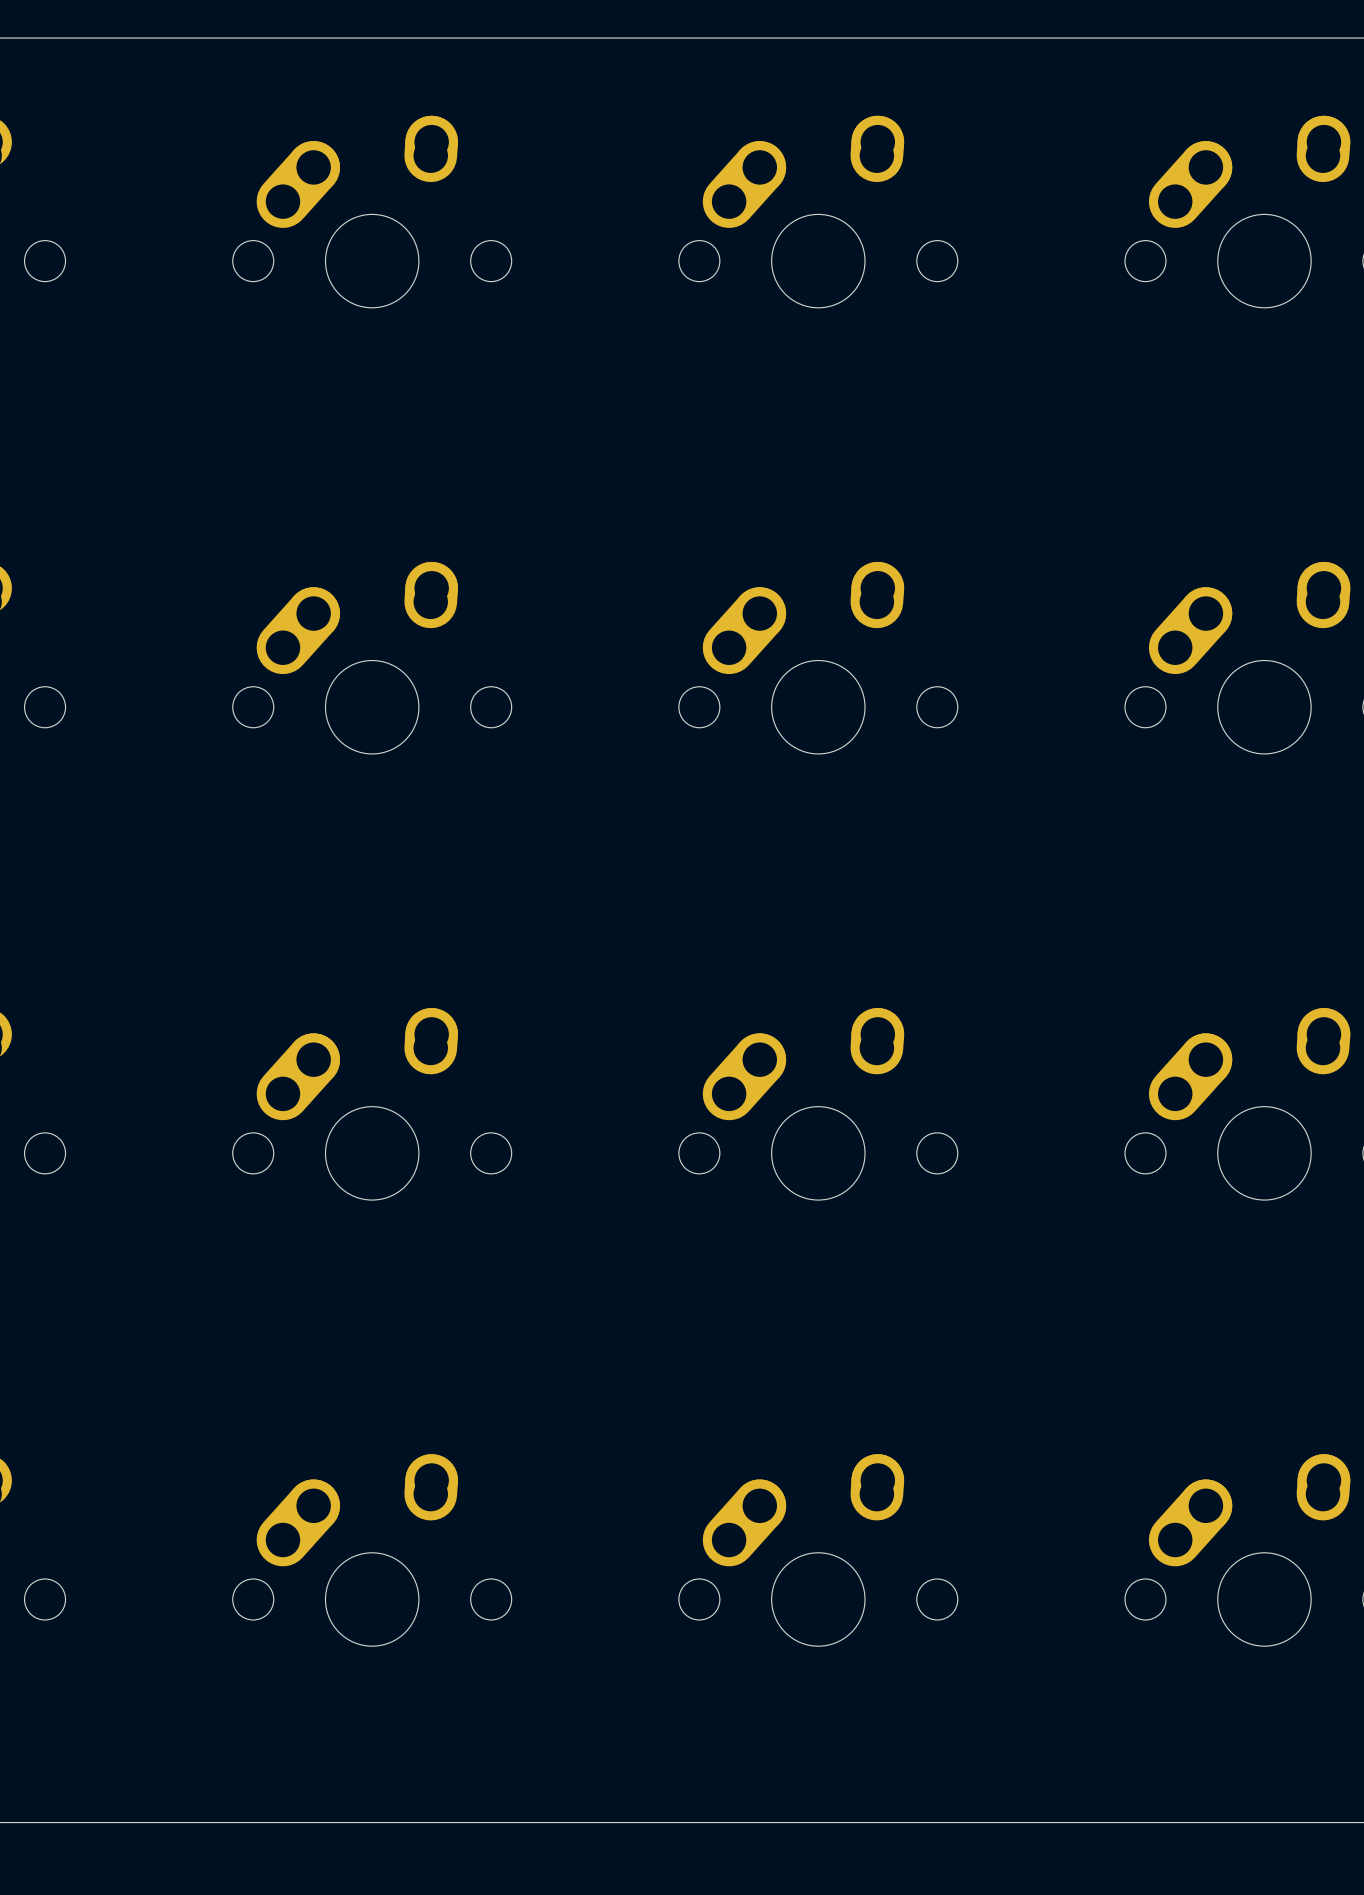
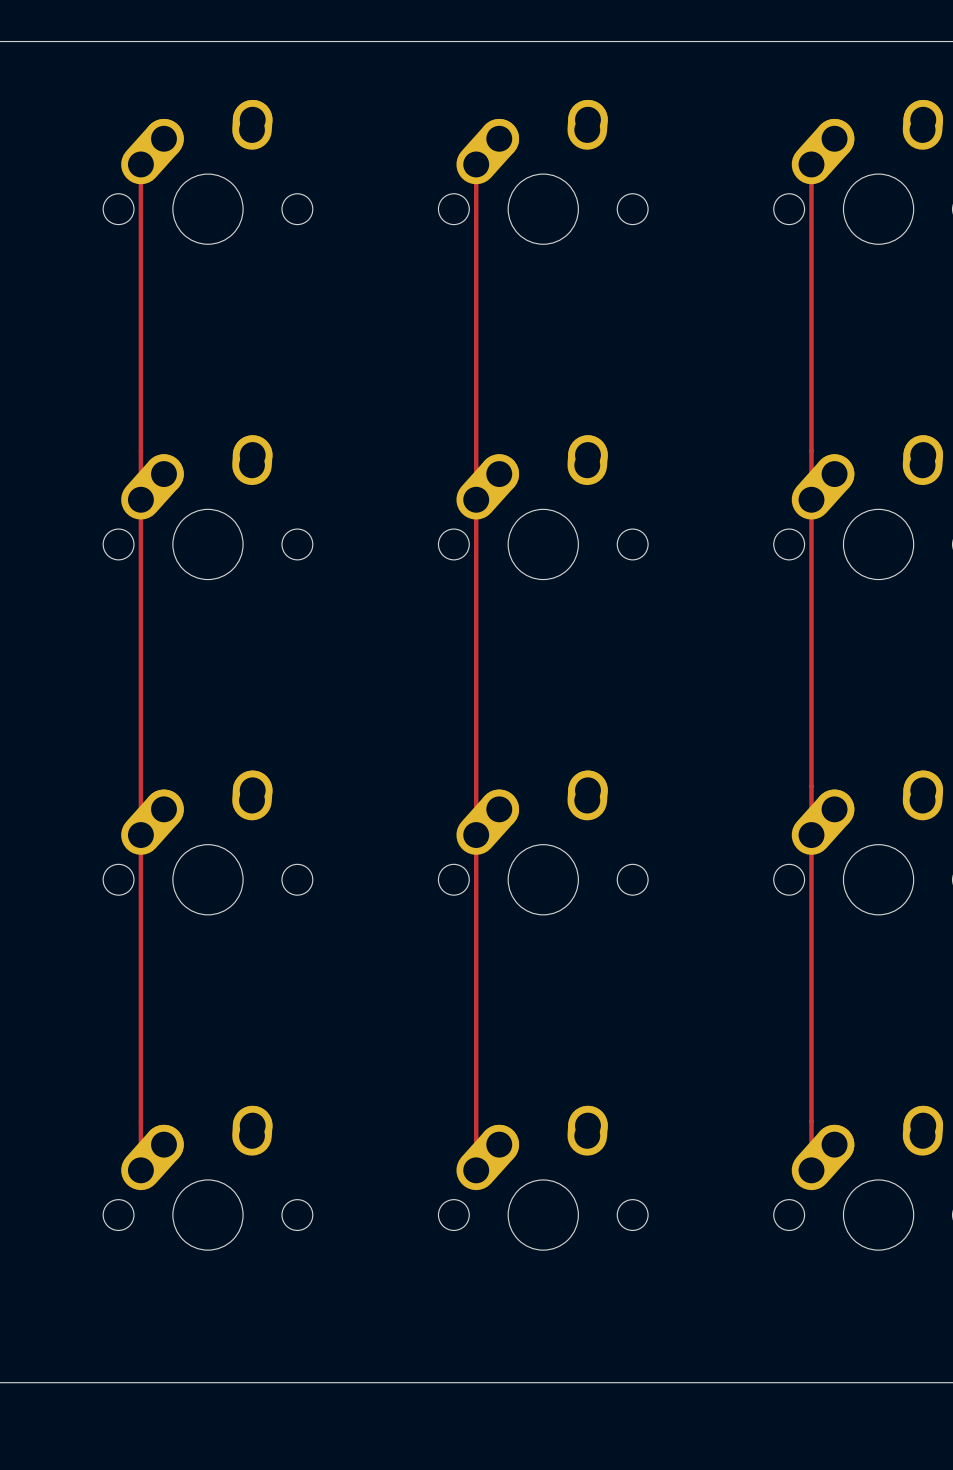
track: none -> (140, 164) (140, 1170)
track: none -> (476, 164) (476, 1170)
track: none -> (811, 164) (811, 1170)

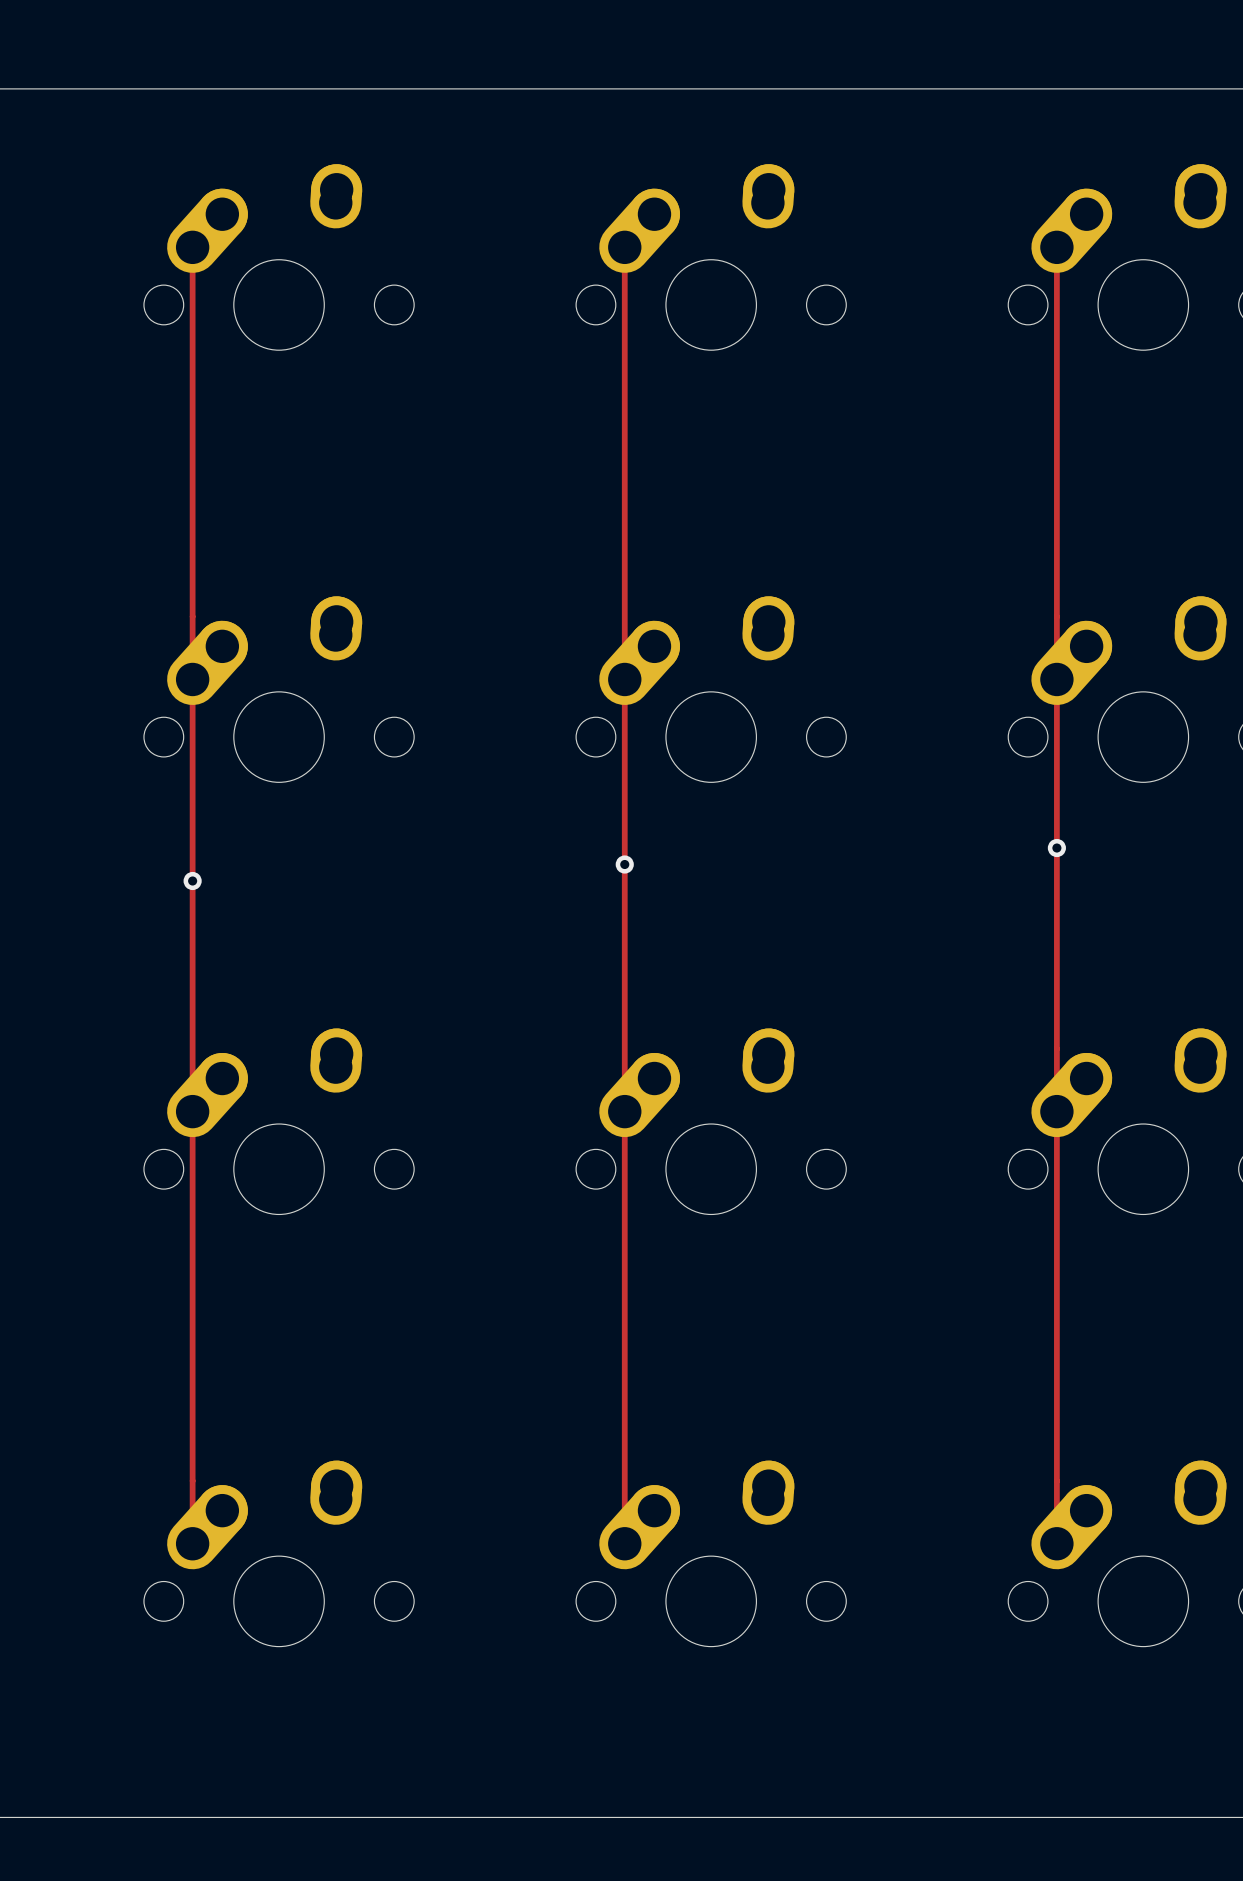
via: none -> (1056, 848)
via: none -> (624, 864)
via: none -> (192, 881)

